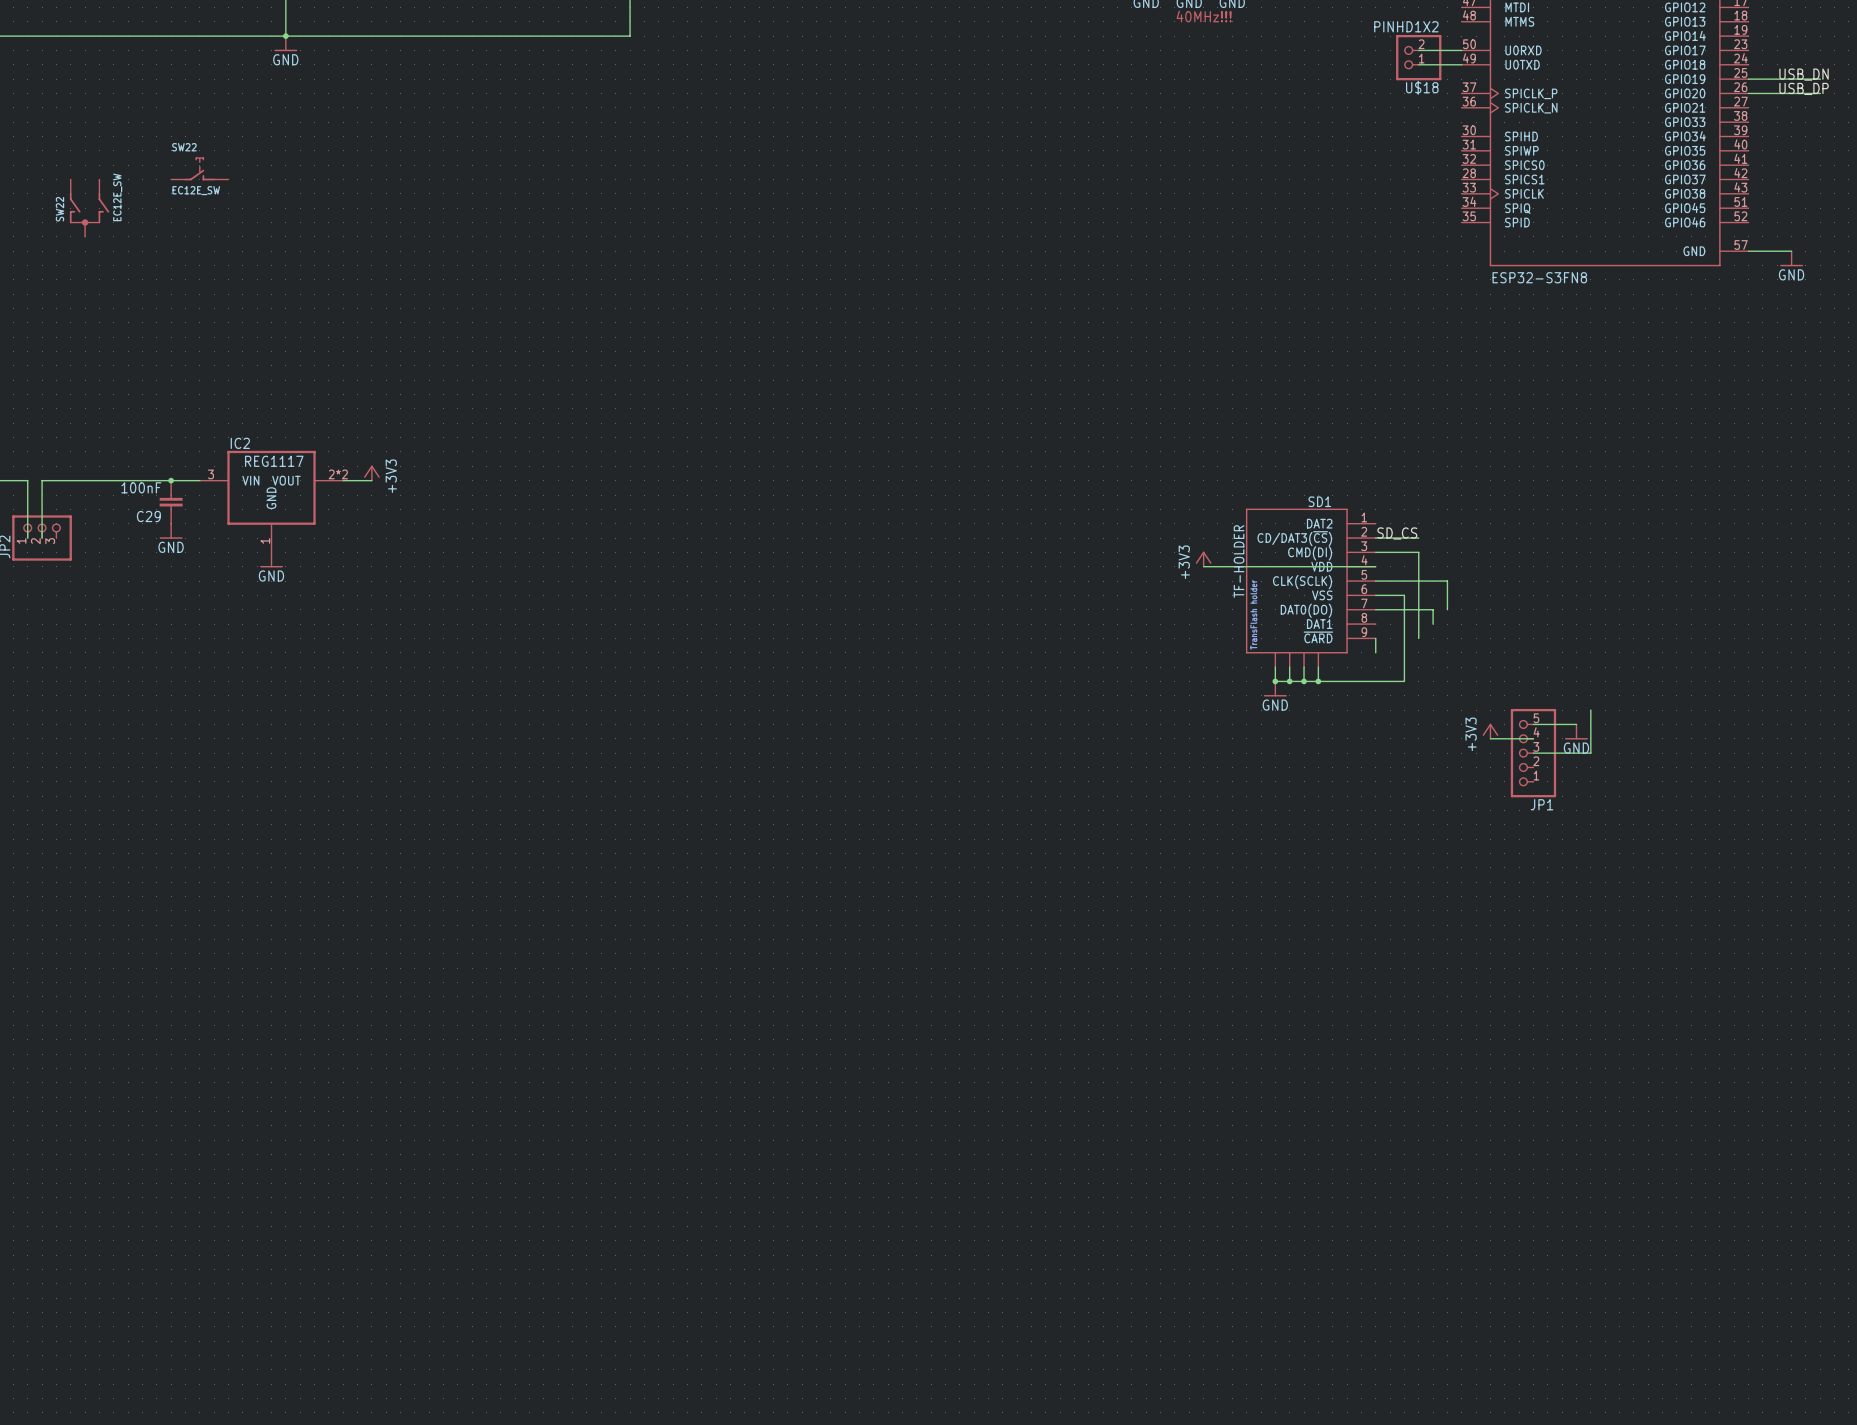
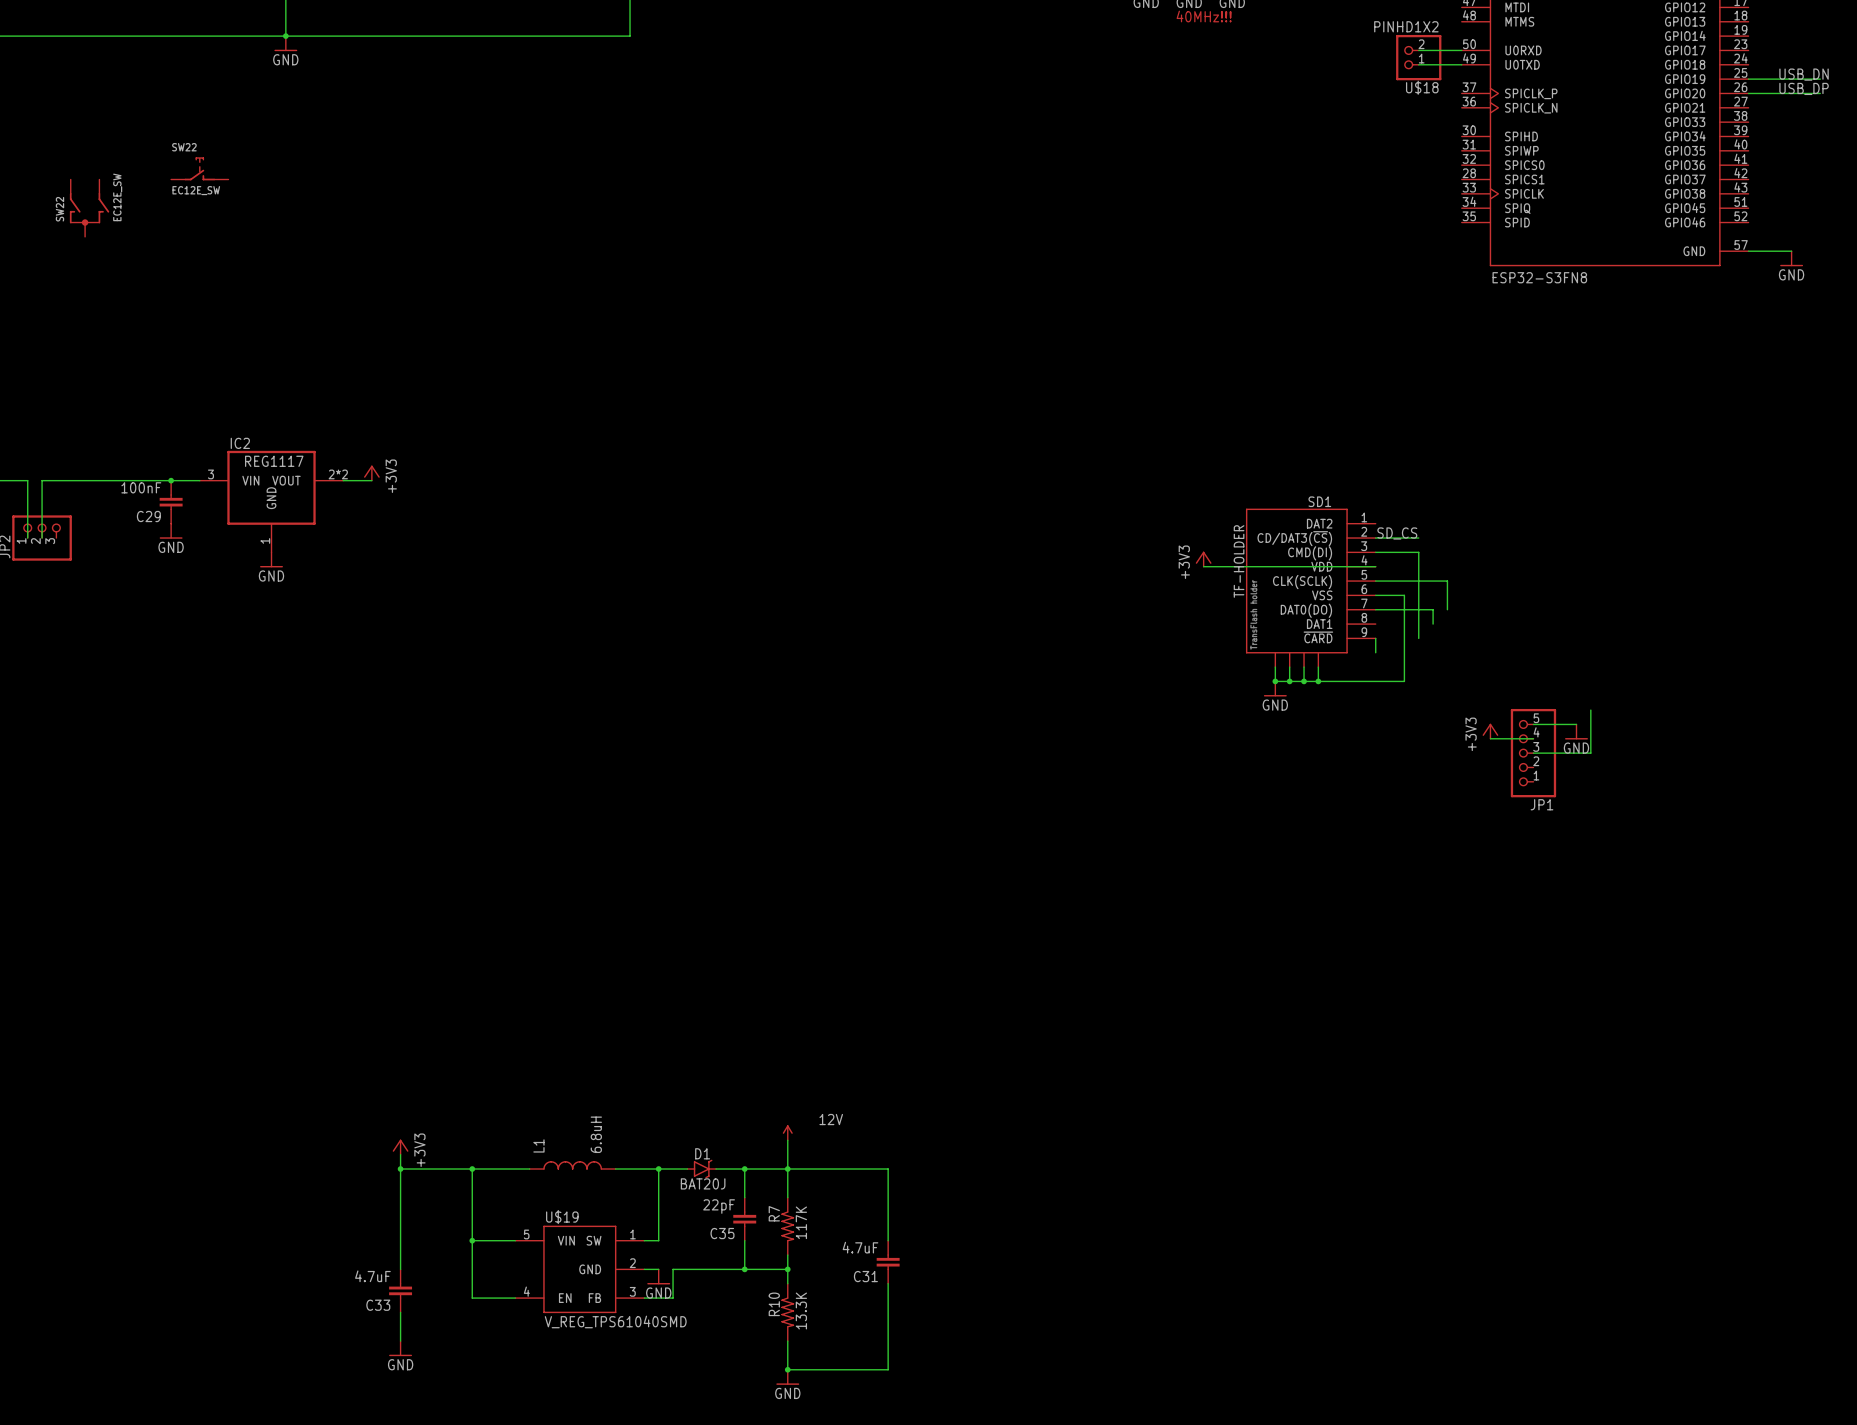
power symbol: none -> 12V (787, 1132)
wire: none -> (787, 1140) (787, 1197)
power symbol: none -> +3V3 (400, 1147)
wire: none -> (400, 1154) (400, 1269)
L1: none -> 6.8uH (572, 1165)
wire: none -> (400, 1169) (529, 1169)
junction: none -> (400, 1169)
wire: none -> (472, 1169) (472, 1298) (515, 1298)
junction: none -> (472, 1169)
wire: none -> (615, 1169) (687, 1169)
wire: none -> (658, 1169) (658, 1240) (644, 1240)
junction: none -> (658, 1169)
D1: none -> BAT20J (701, 1169)
wire: none -> (716, 1169) (888, 1169) (888, 1240)
wire: none -> (744, 1169) (744, 1197)
junction: none -> (744, 1169)
junction: none -> (787, 1169)
C35: none -> 22pF (744, 1219)
R7: none -> 117K (787, 1226)
wire: none -> (472, 1240) (515, 1240)
junction: none -> (472, 1240)
wire: none -> (744, 1240) (744, 1269)
wire: none -> (787, 1255) (787, 1283)
C31: none -> 4.7uF (888, 1262)
U$19: none -> V_REG_TPS61040SMD (579, 1269)
wire: none -> (644, 1269) (658, 1269)
junction: none -> (744, 1269)
wire: none -> (787, 1269) (673, 1269) (673, 1298) (644, 1298)
junction: none -> (787, 1269)
power symbol: none -> GND (658, 1276)
wire: none -> (888, 1283) (888, 1369) (787, 1369) (787, 1341)
C33: none -> 4.7uF (400, 1290)
wire: none -> (400, 1312) (400, 1341)
R10: none -> 13.3K (787, 1312)
power symbol: none -> GND (400, 1348)
junction: none -> (787, 1369)
power symbol: none -> GND (787, 1377)

